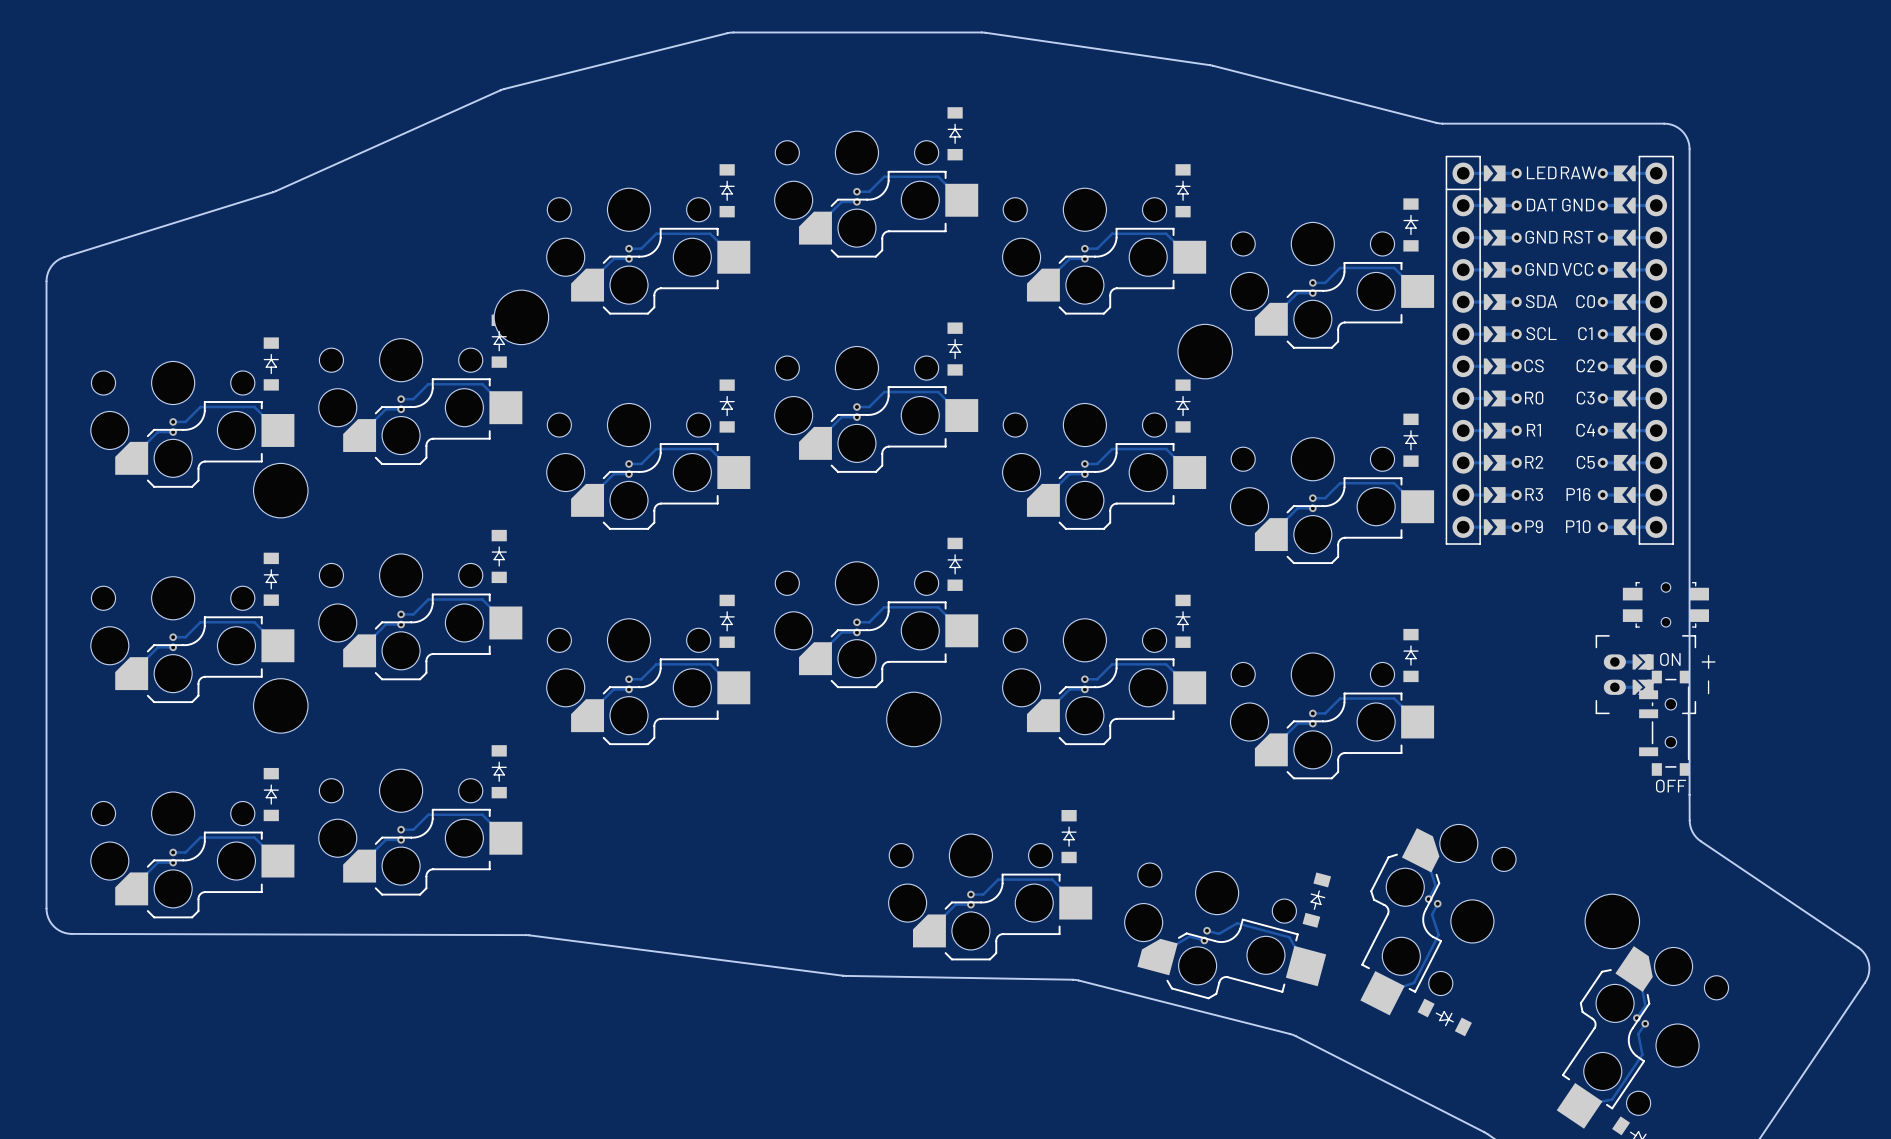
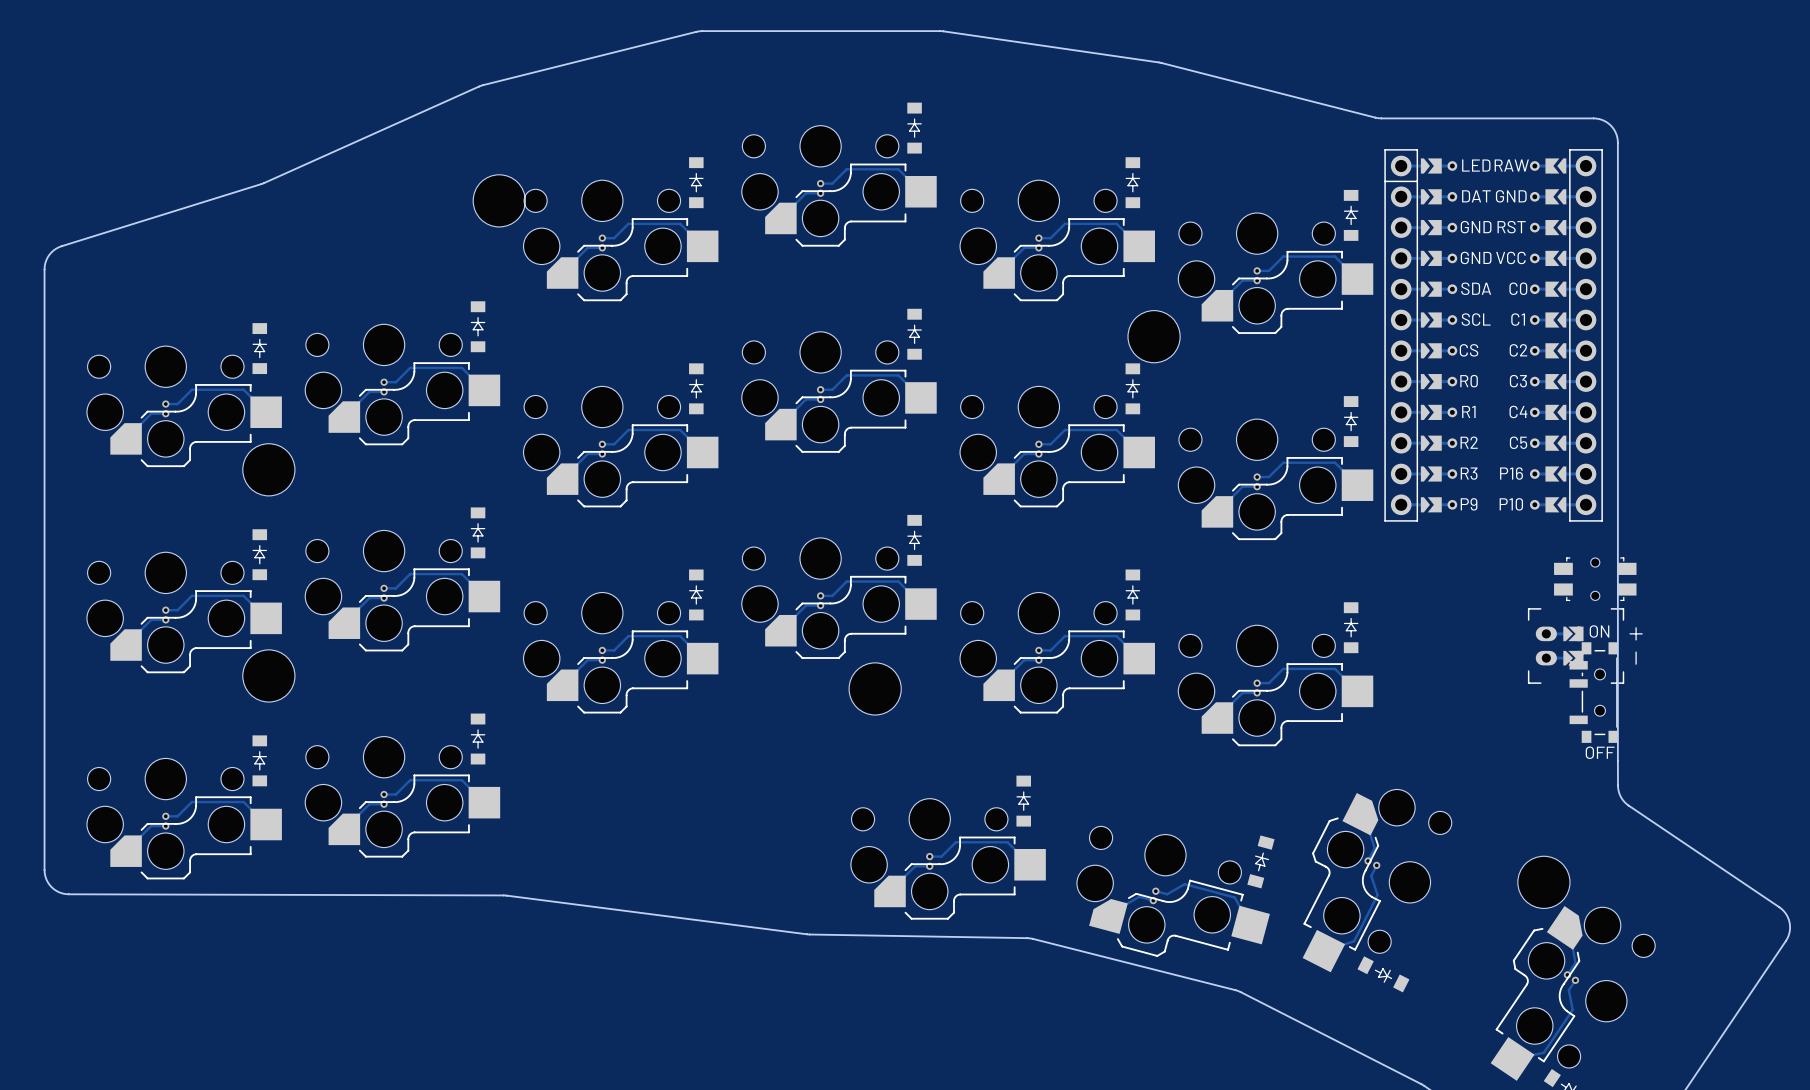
part position: (521, 317) -> (499, 200)

